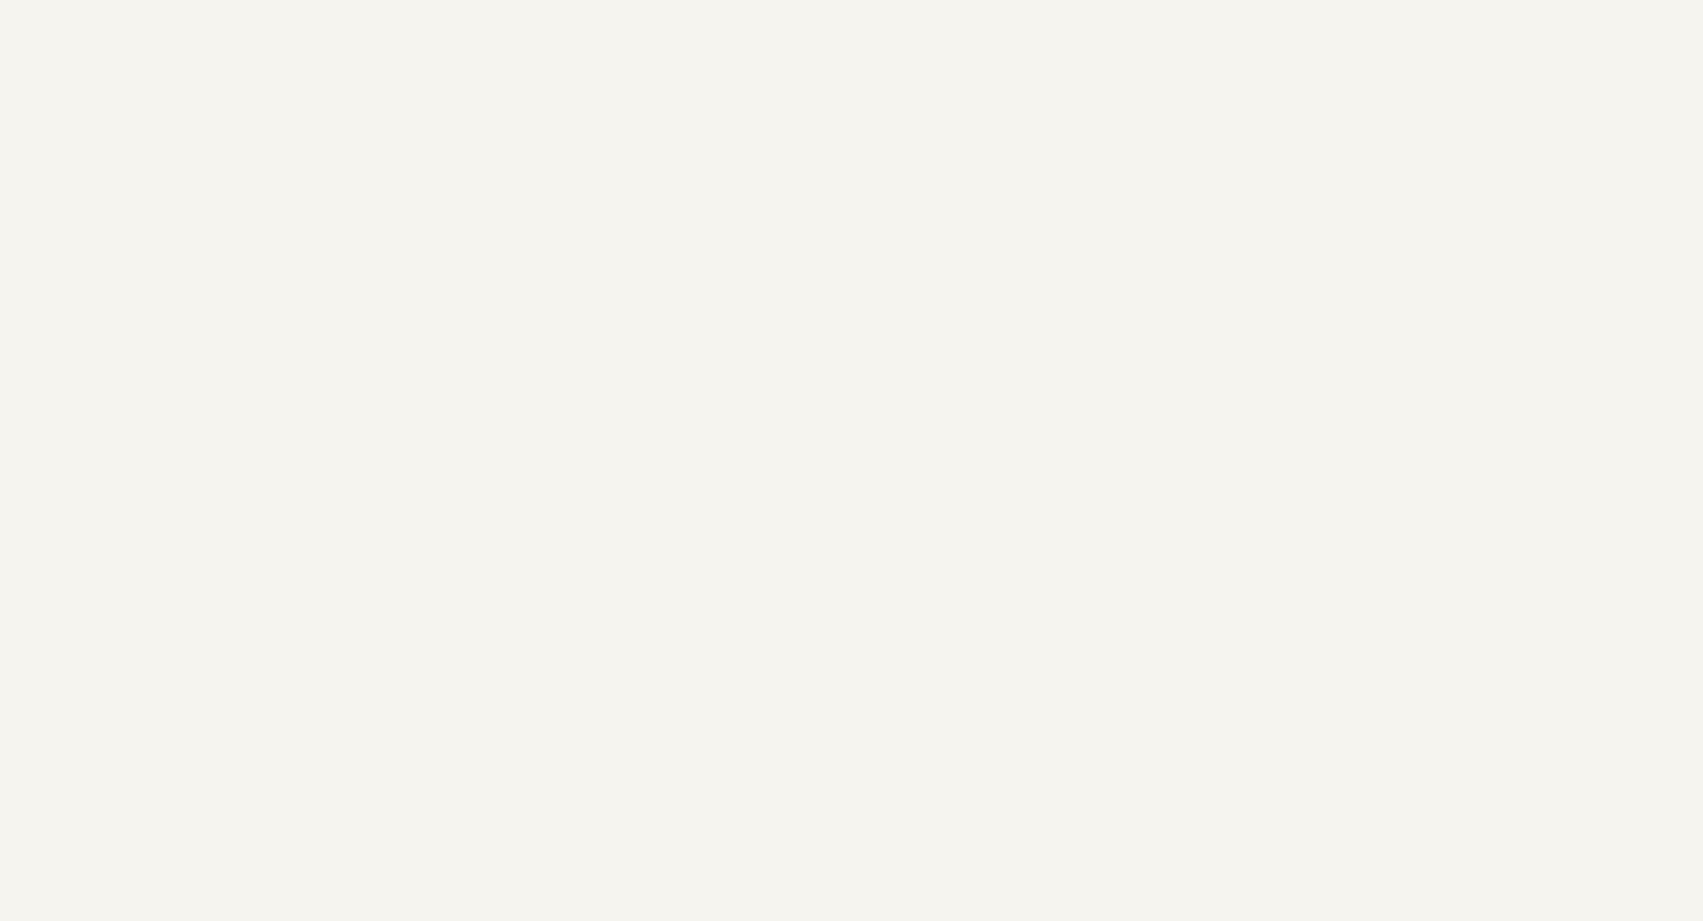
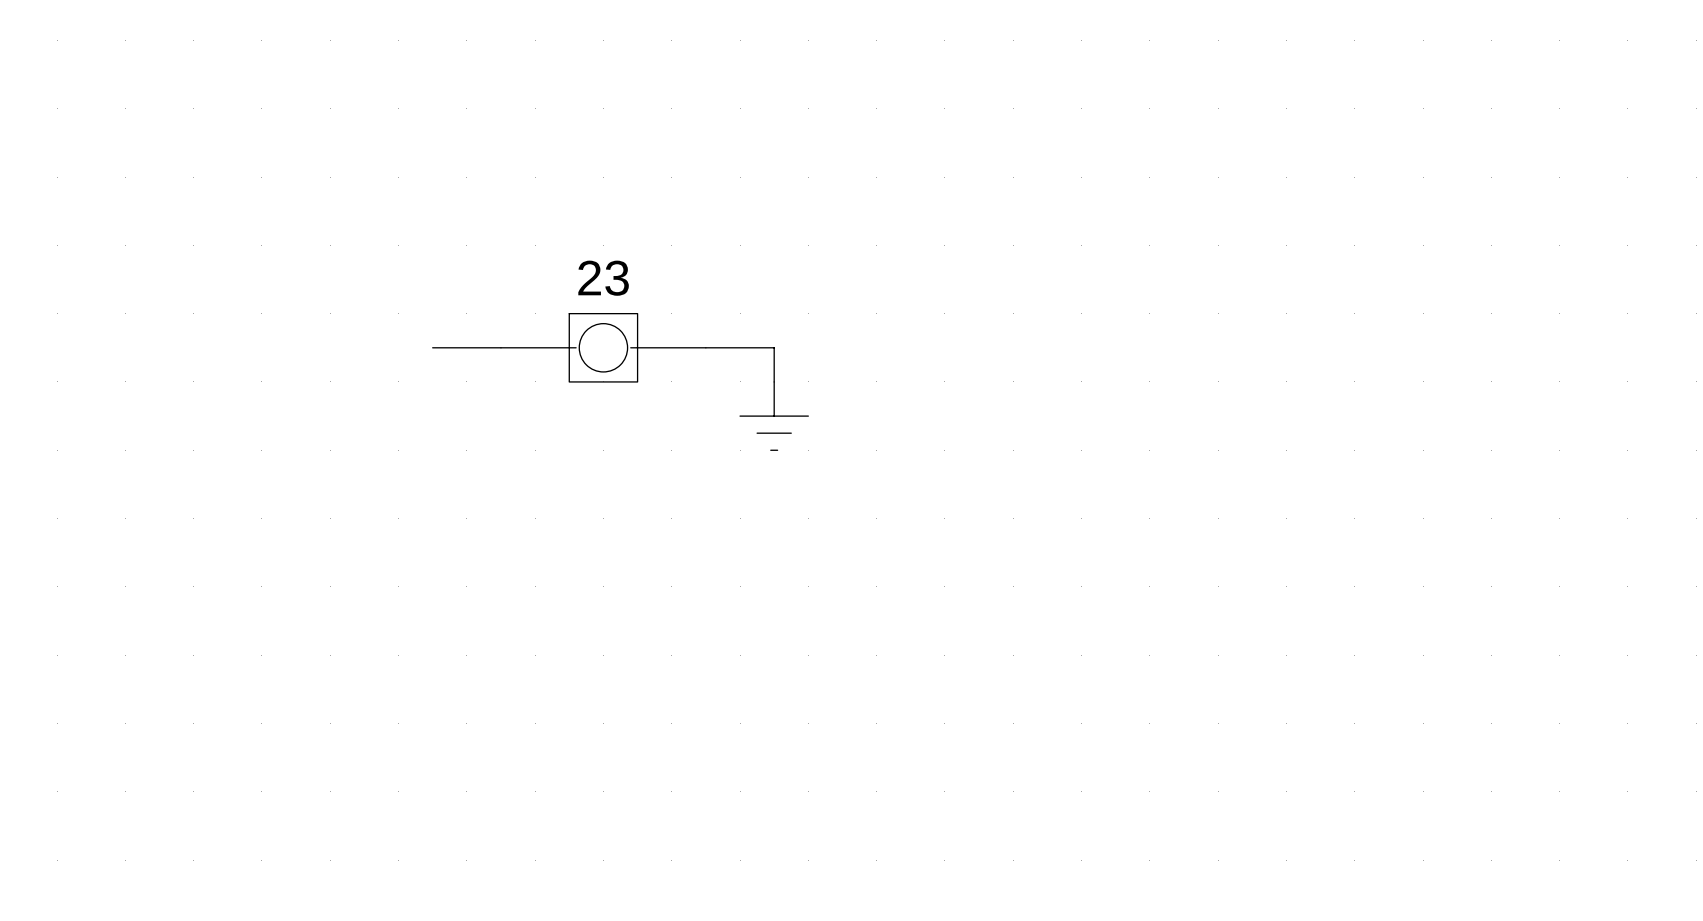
wire: none -> (432, 347) (500, 347)
part: none -> 23 (603, 347)
wire: none -> (705, 347) (774, 347) (774, 381)
power symbol: none -> (774, 416)

